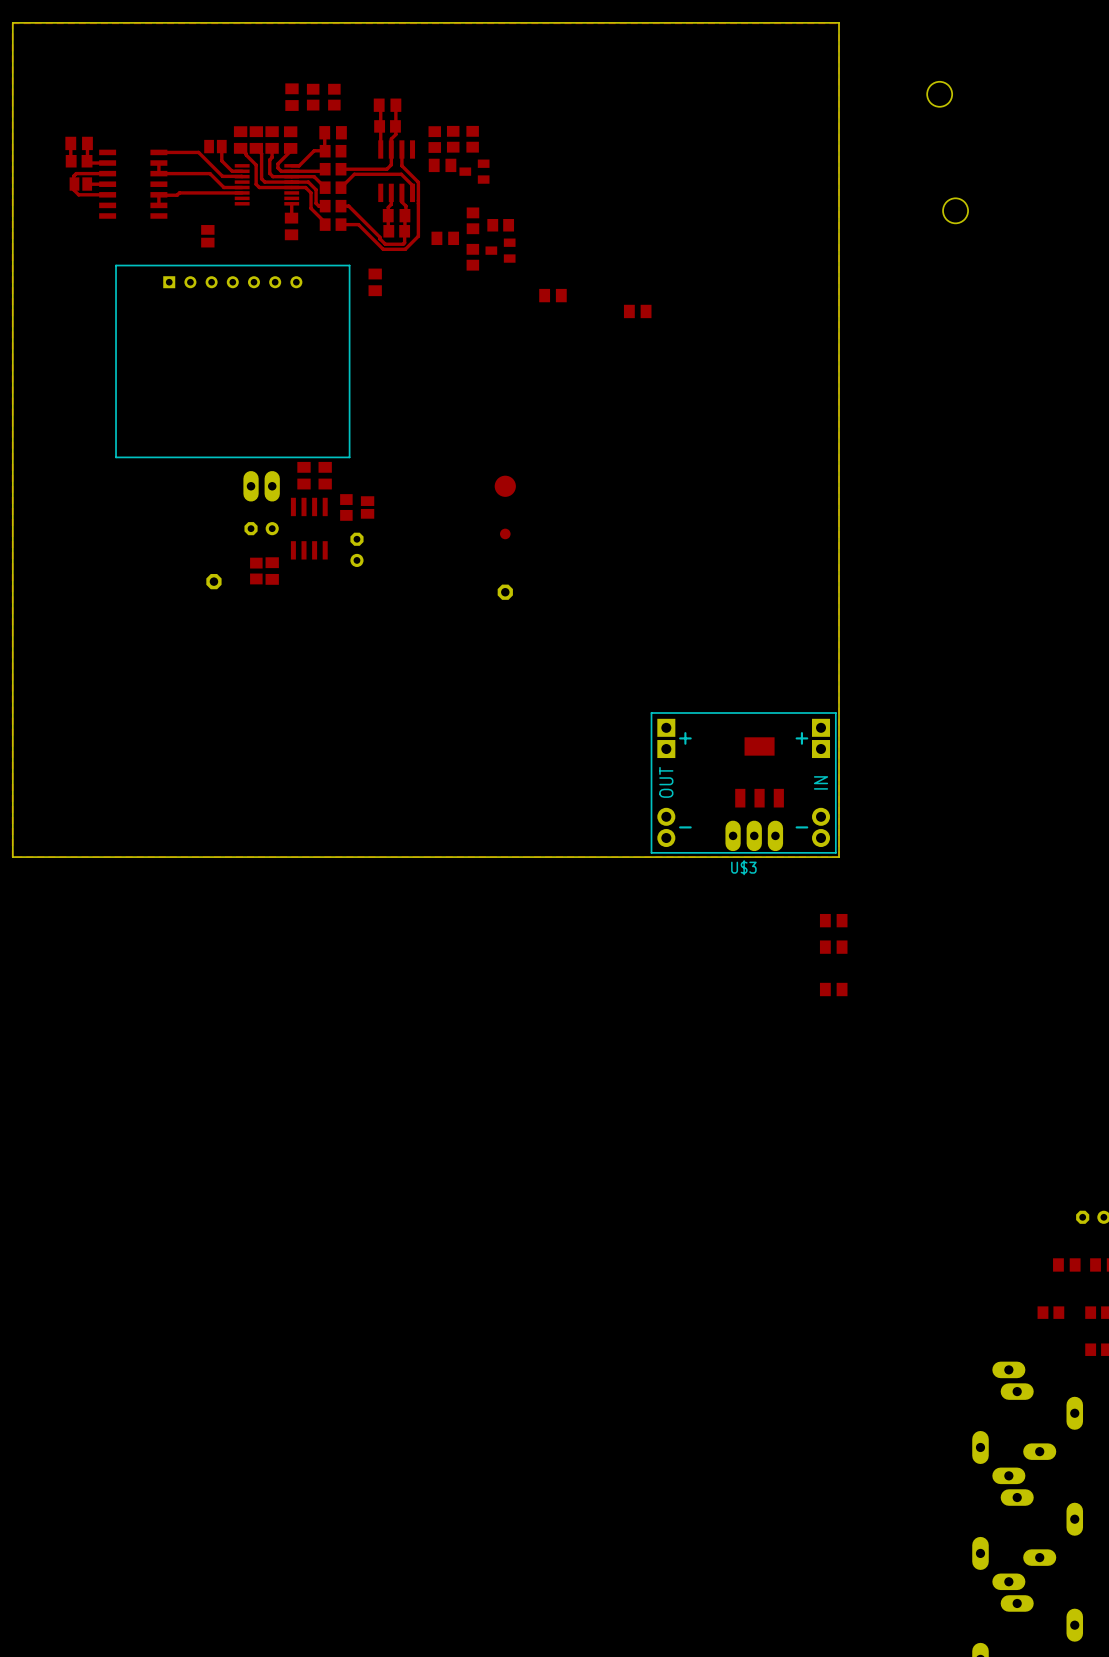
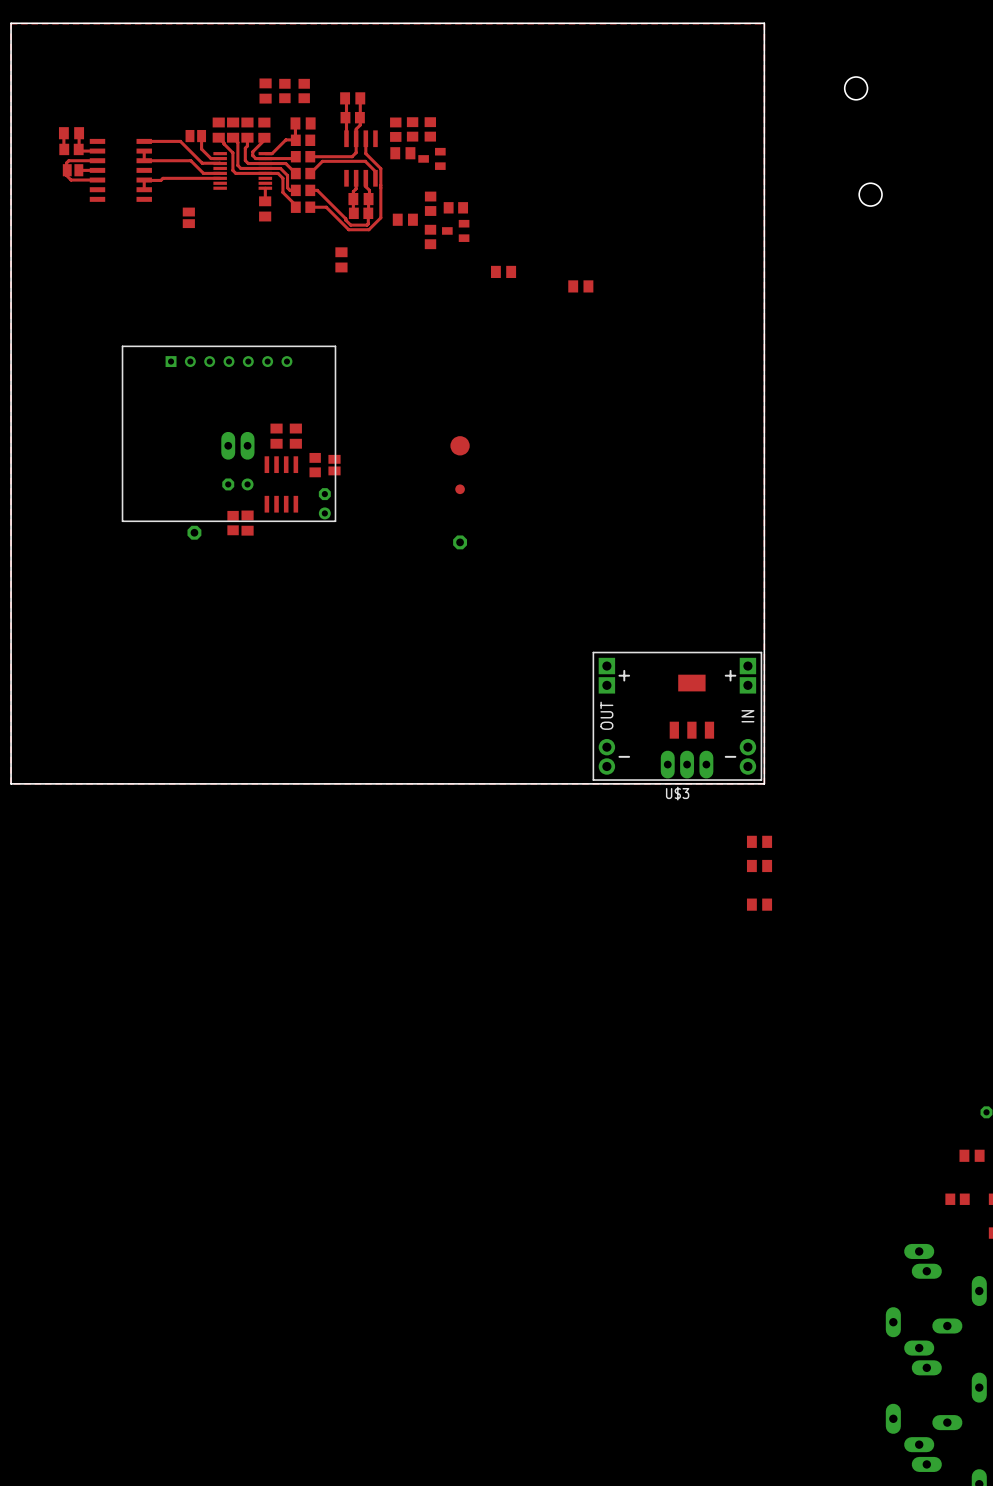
part position: (232, 361) -> (229, 433)

